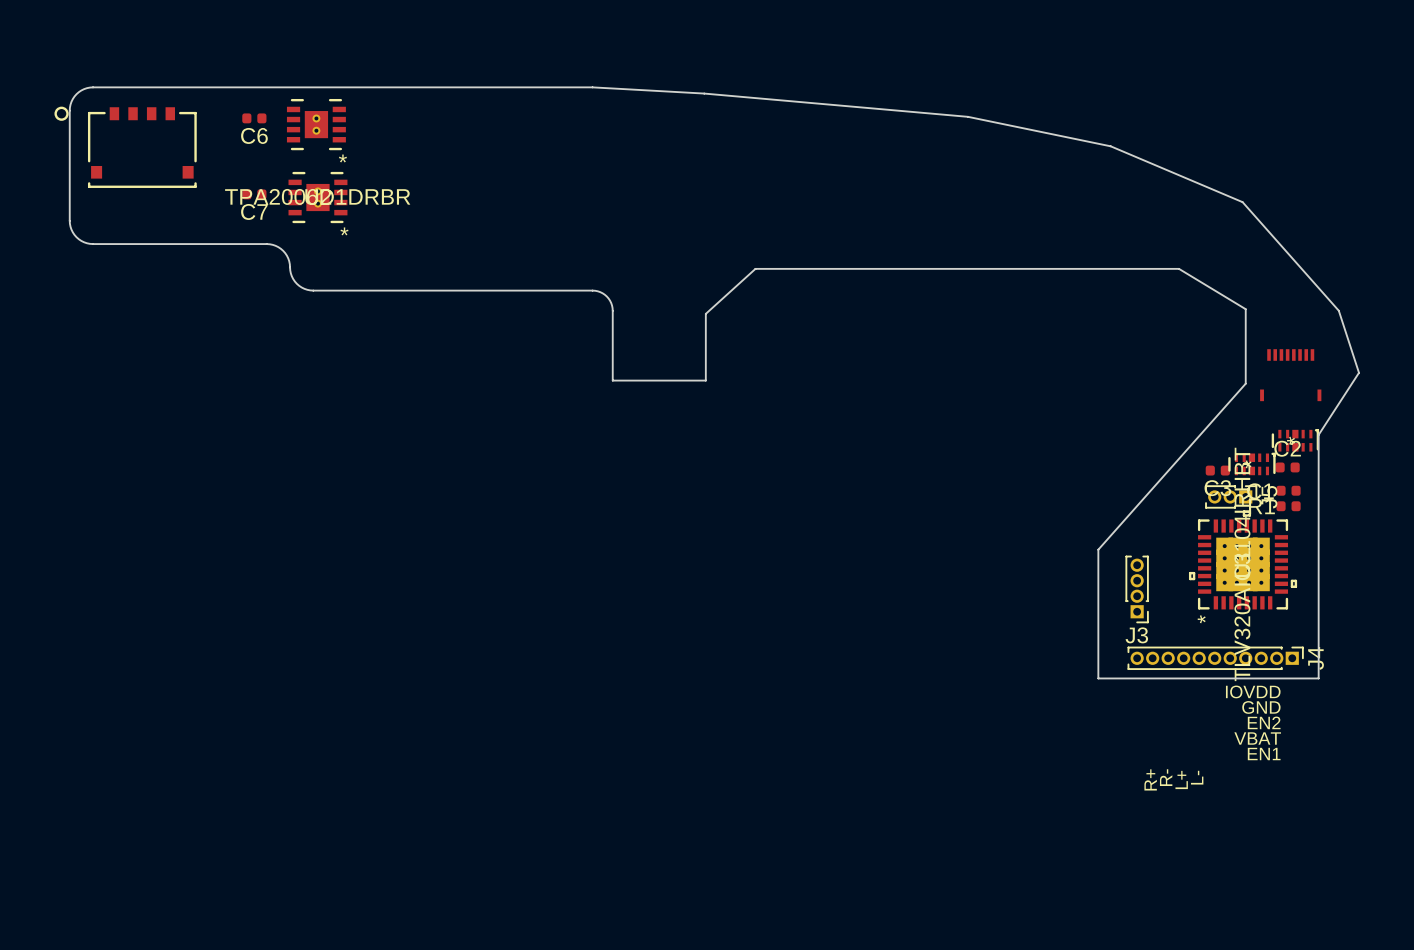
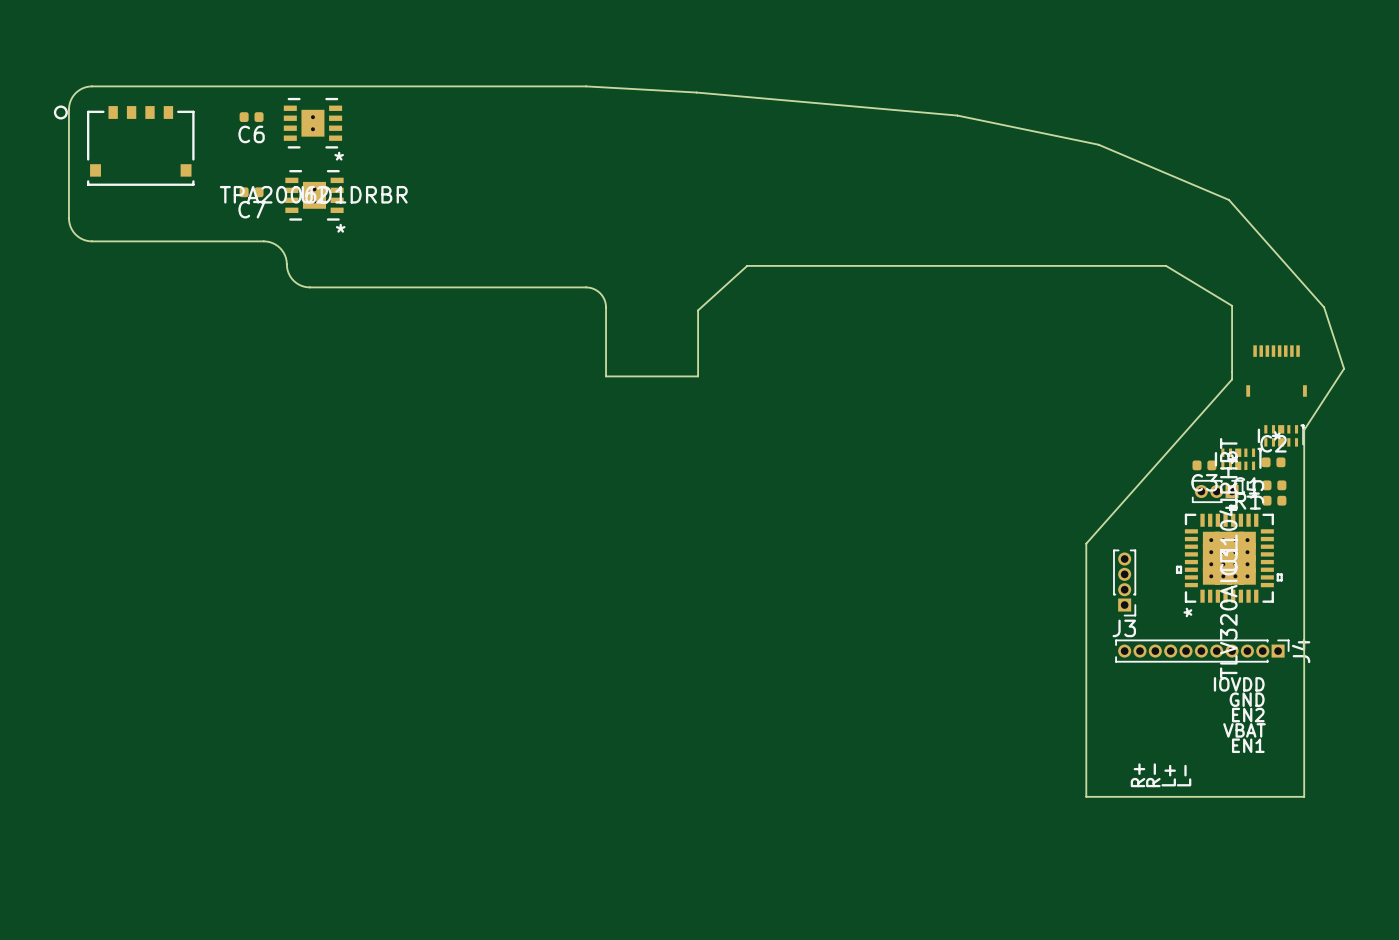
board edge: (1098, 678) (1318, 678) -> (1086, 671) (1086, 796) (1304, 796) (1304, 671)

